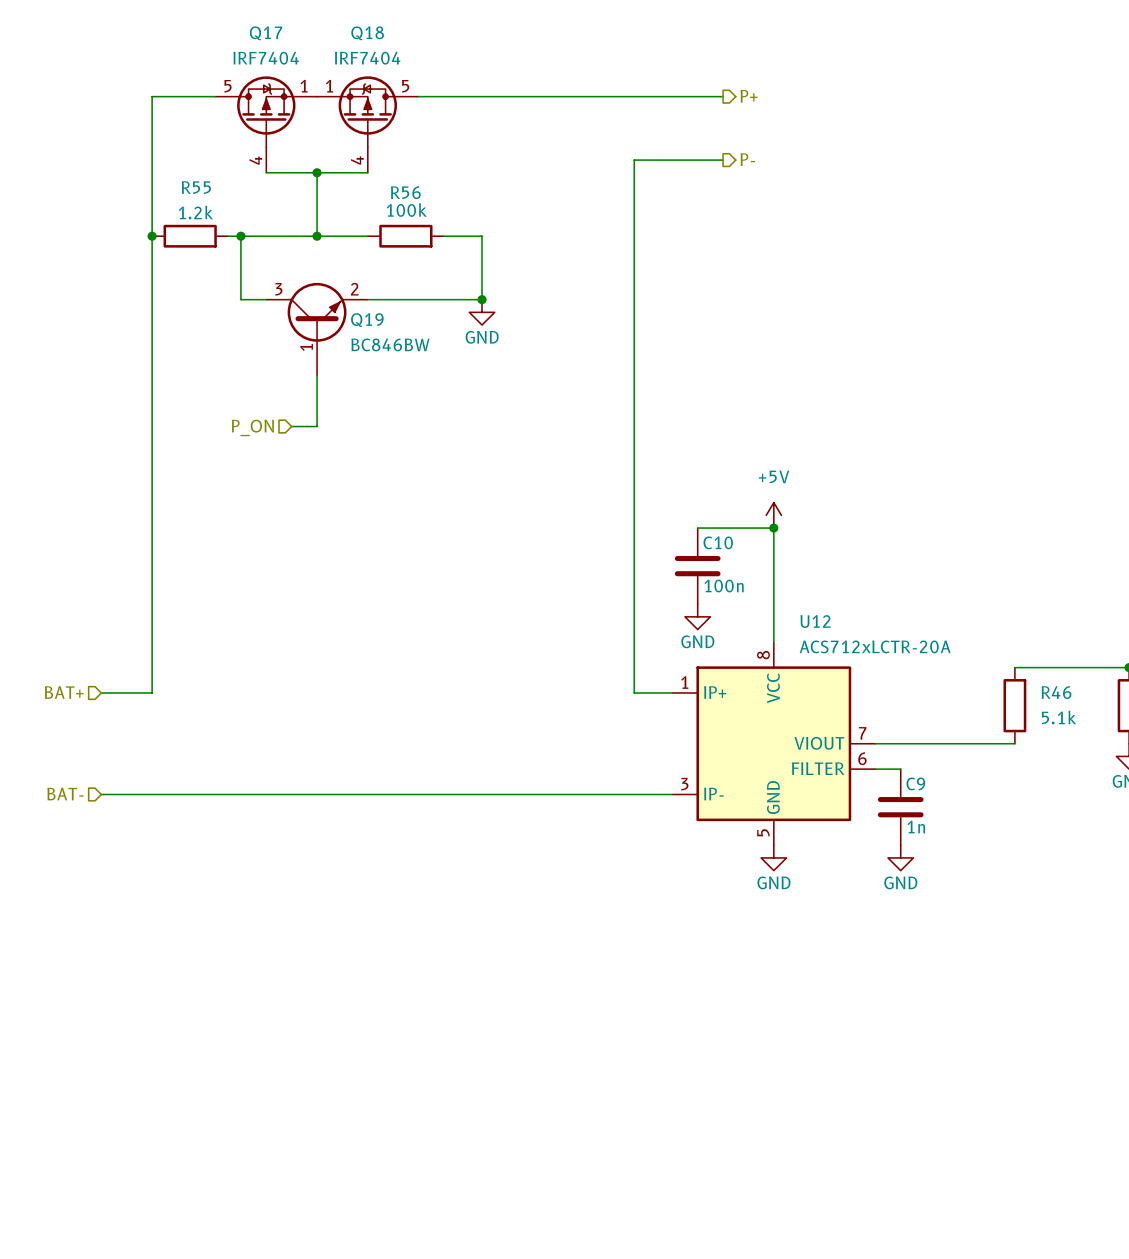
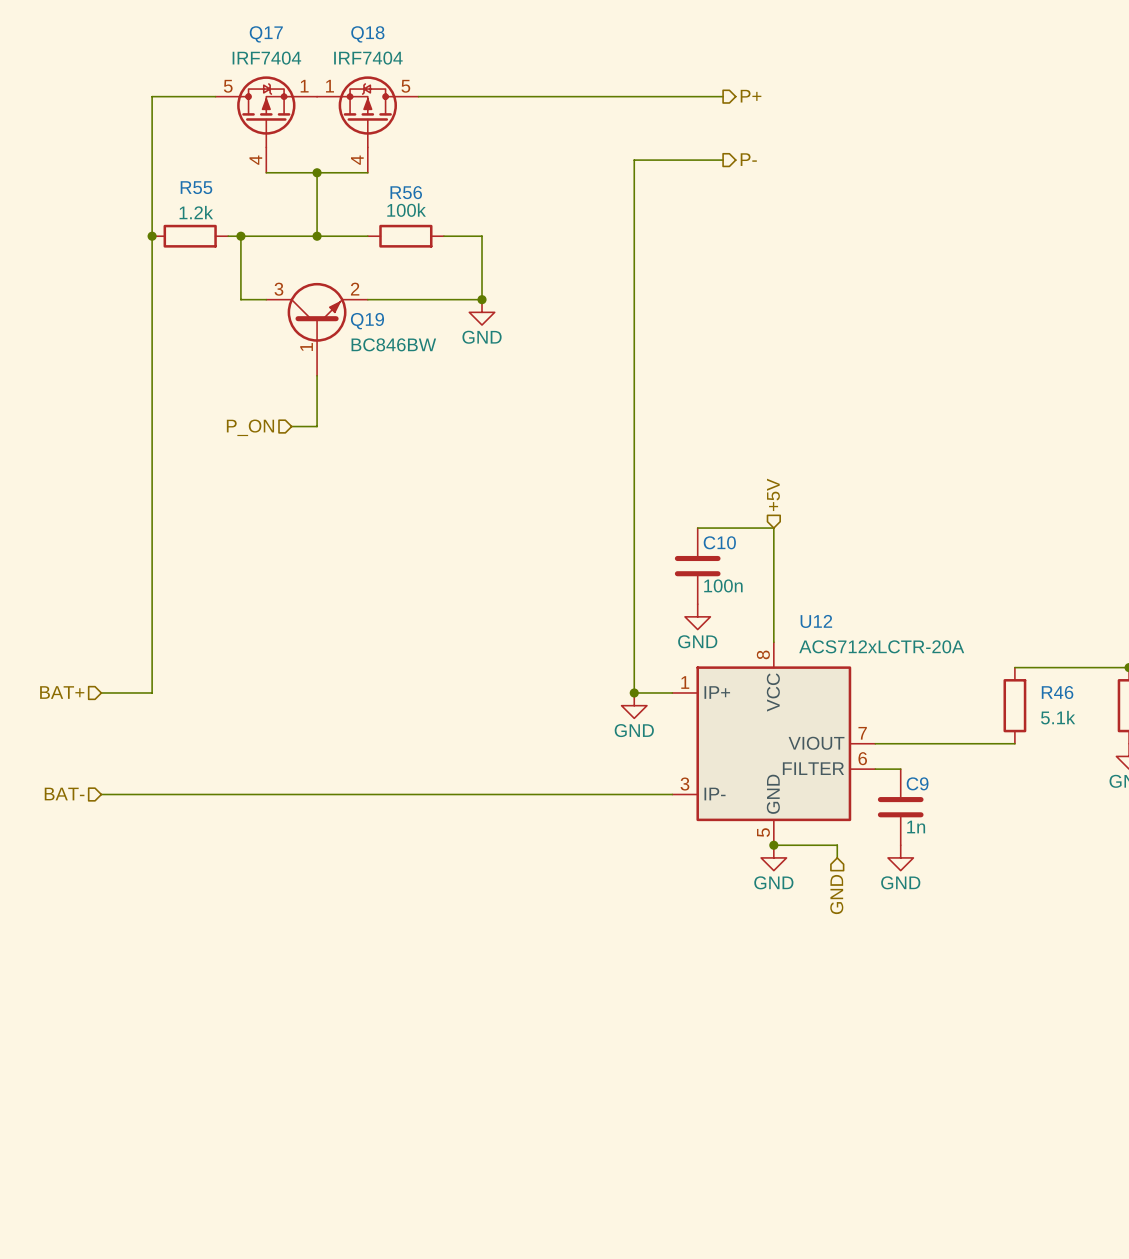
hierarchical label: none -> +5V (773, 494)
power symbol: +5V (773, 515) -> none
junction: (773, 528) -> none
junction: none -> (634, 692)
power symbol: none -> GND (634, 705)
wire: none -> (773, 845) (837, 845) (837, 857)
junction: none -> (773, 845)
hierarchical label: none -> GND (836, 894)

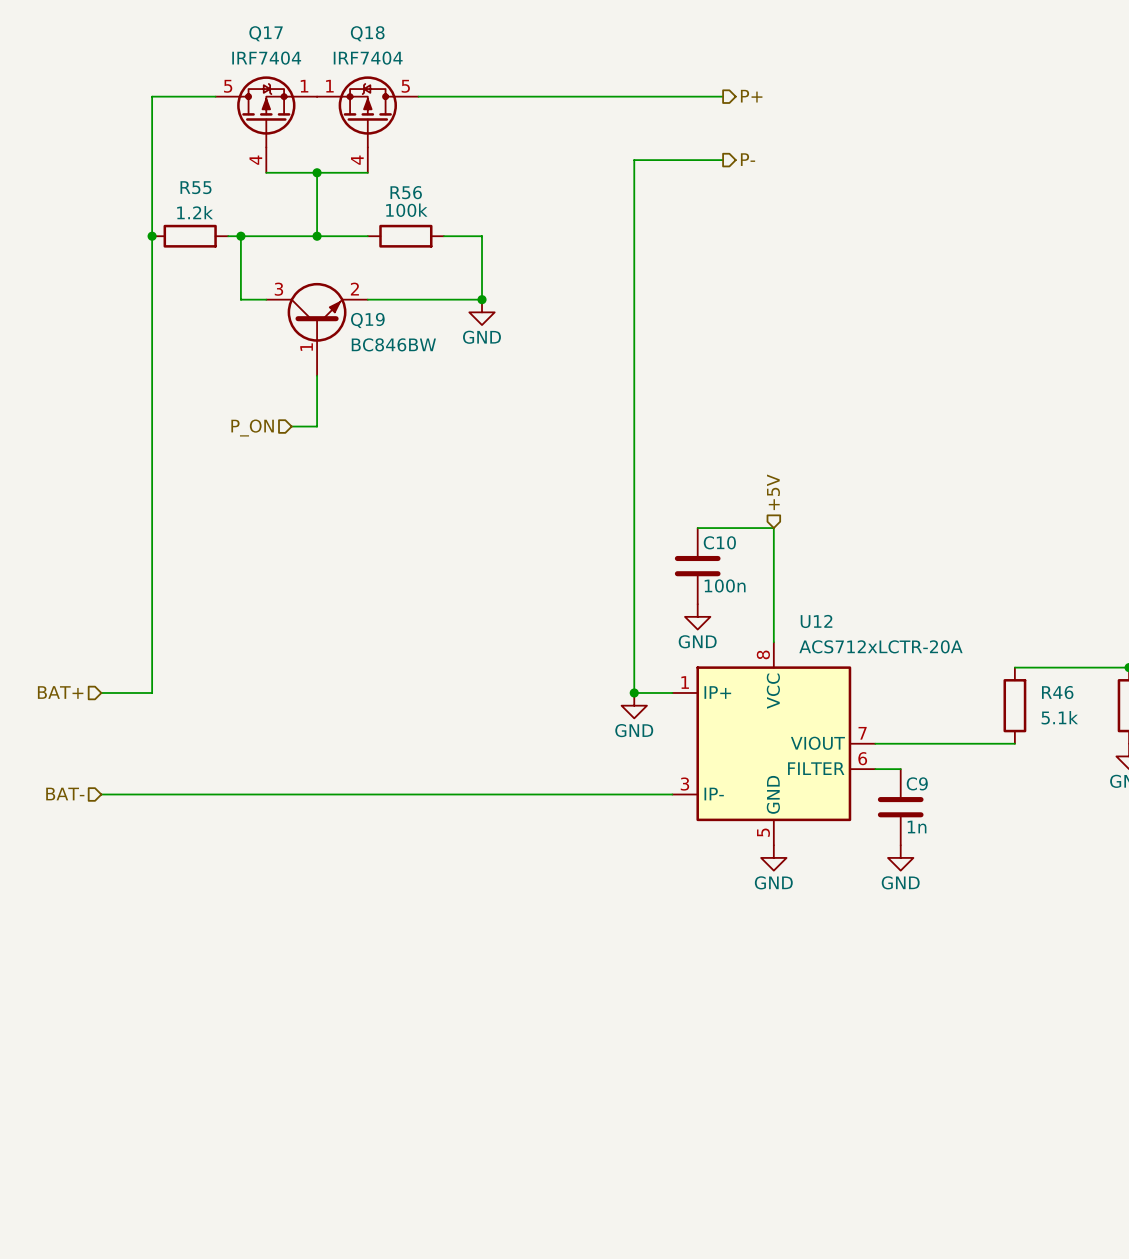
wire: (773, 845) (837, 845) (837, 857) -> none
junction: (773, 845) -> none
hierarchical label: GND (836, 894) -> none

